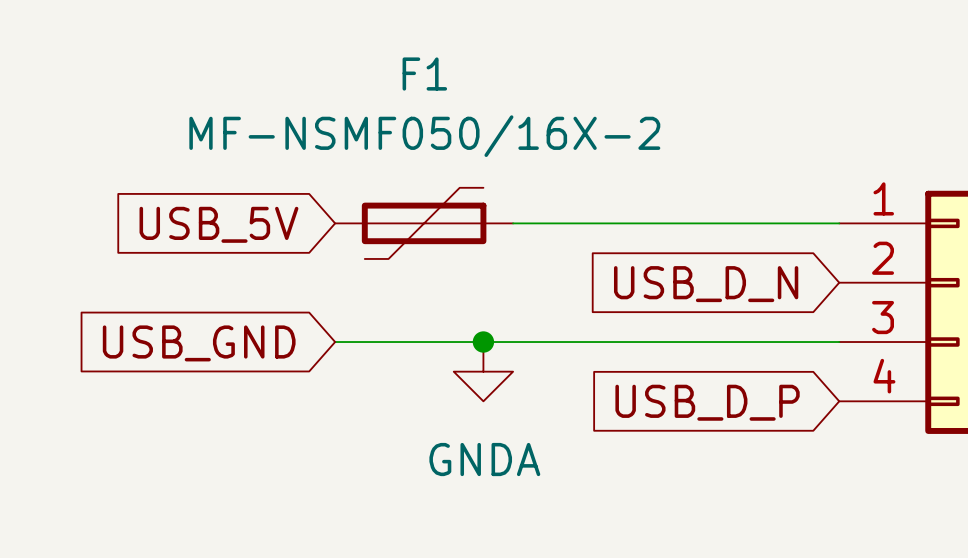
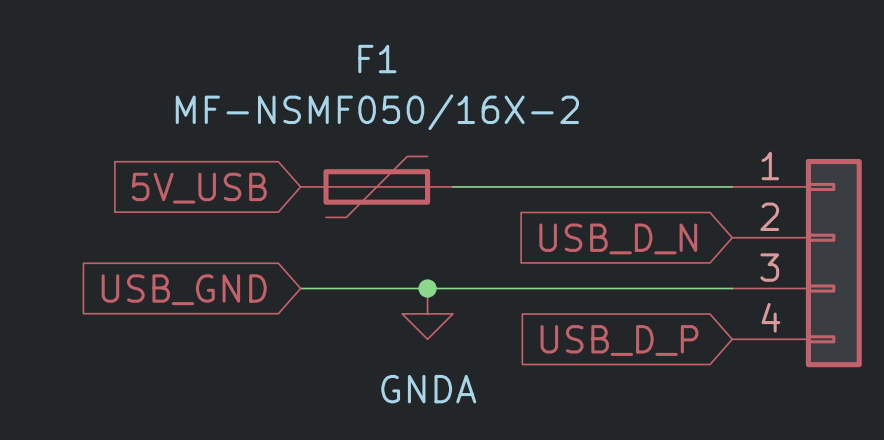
global label: USB_5V (218, 224) -> 5V_USB (199, 188)

